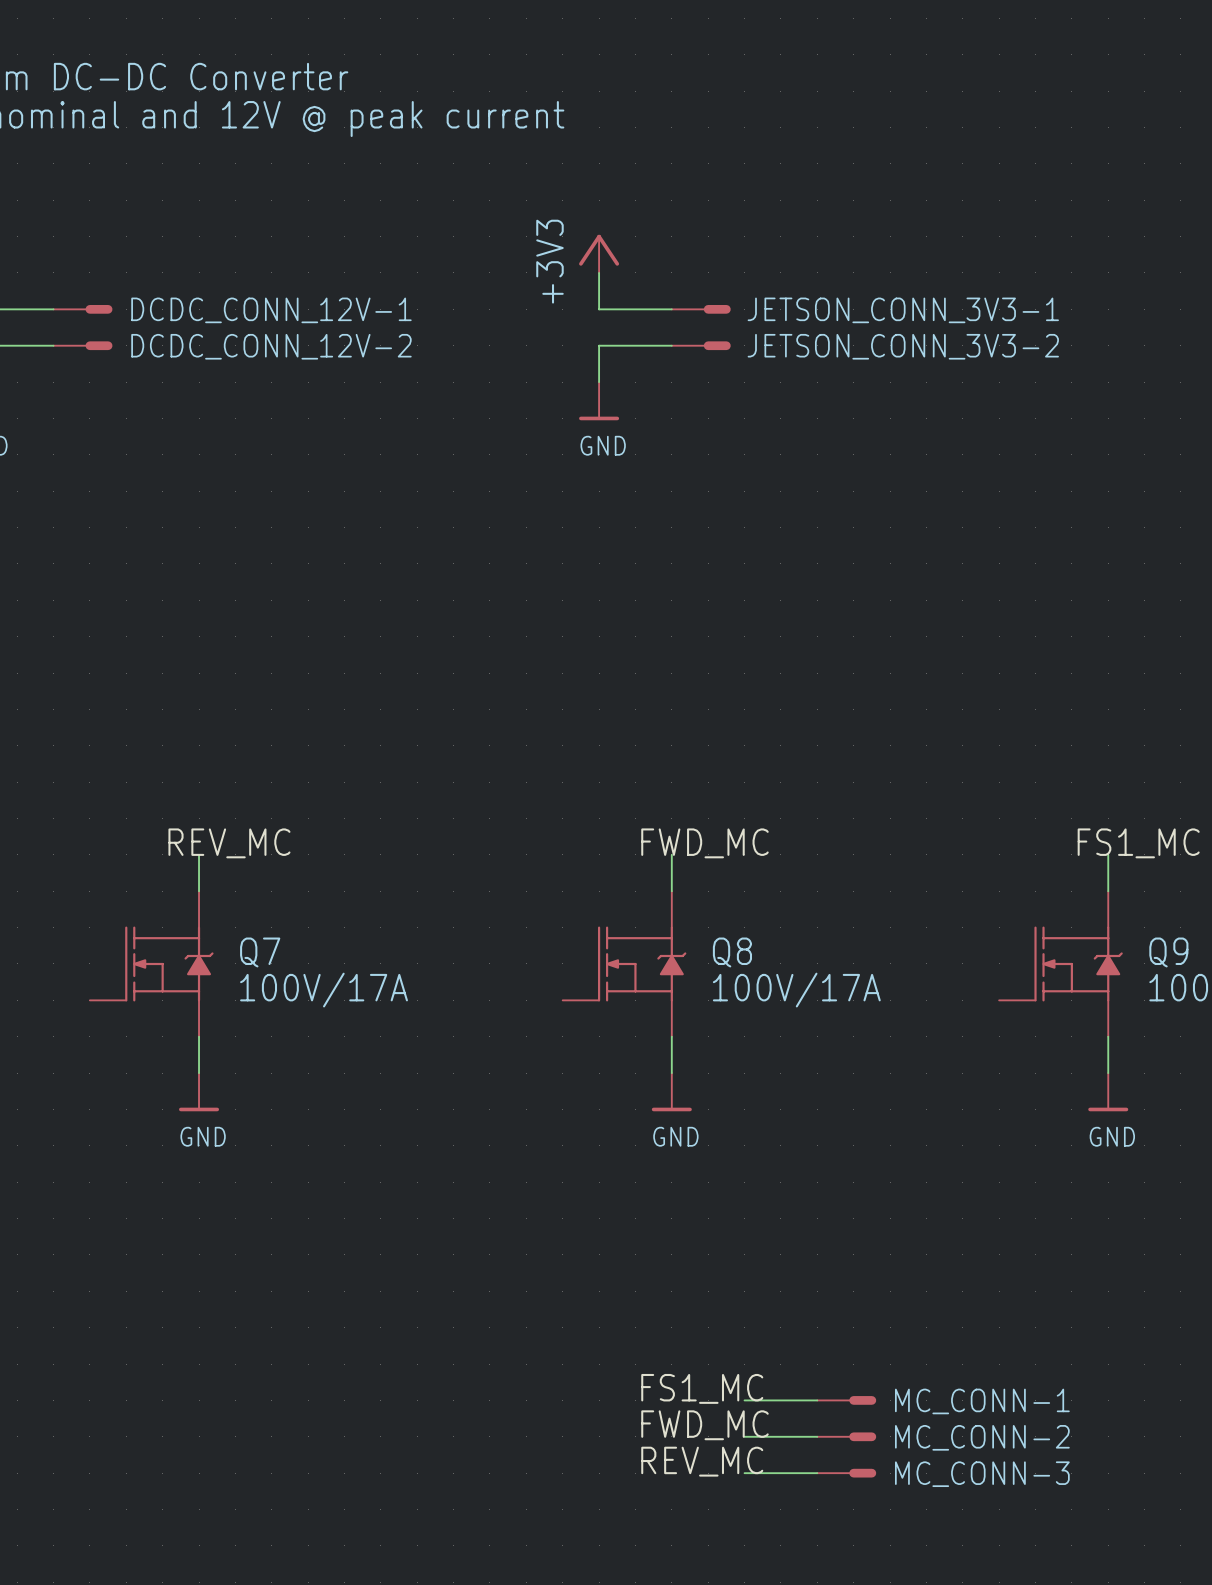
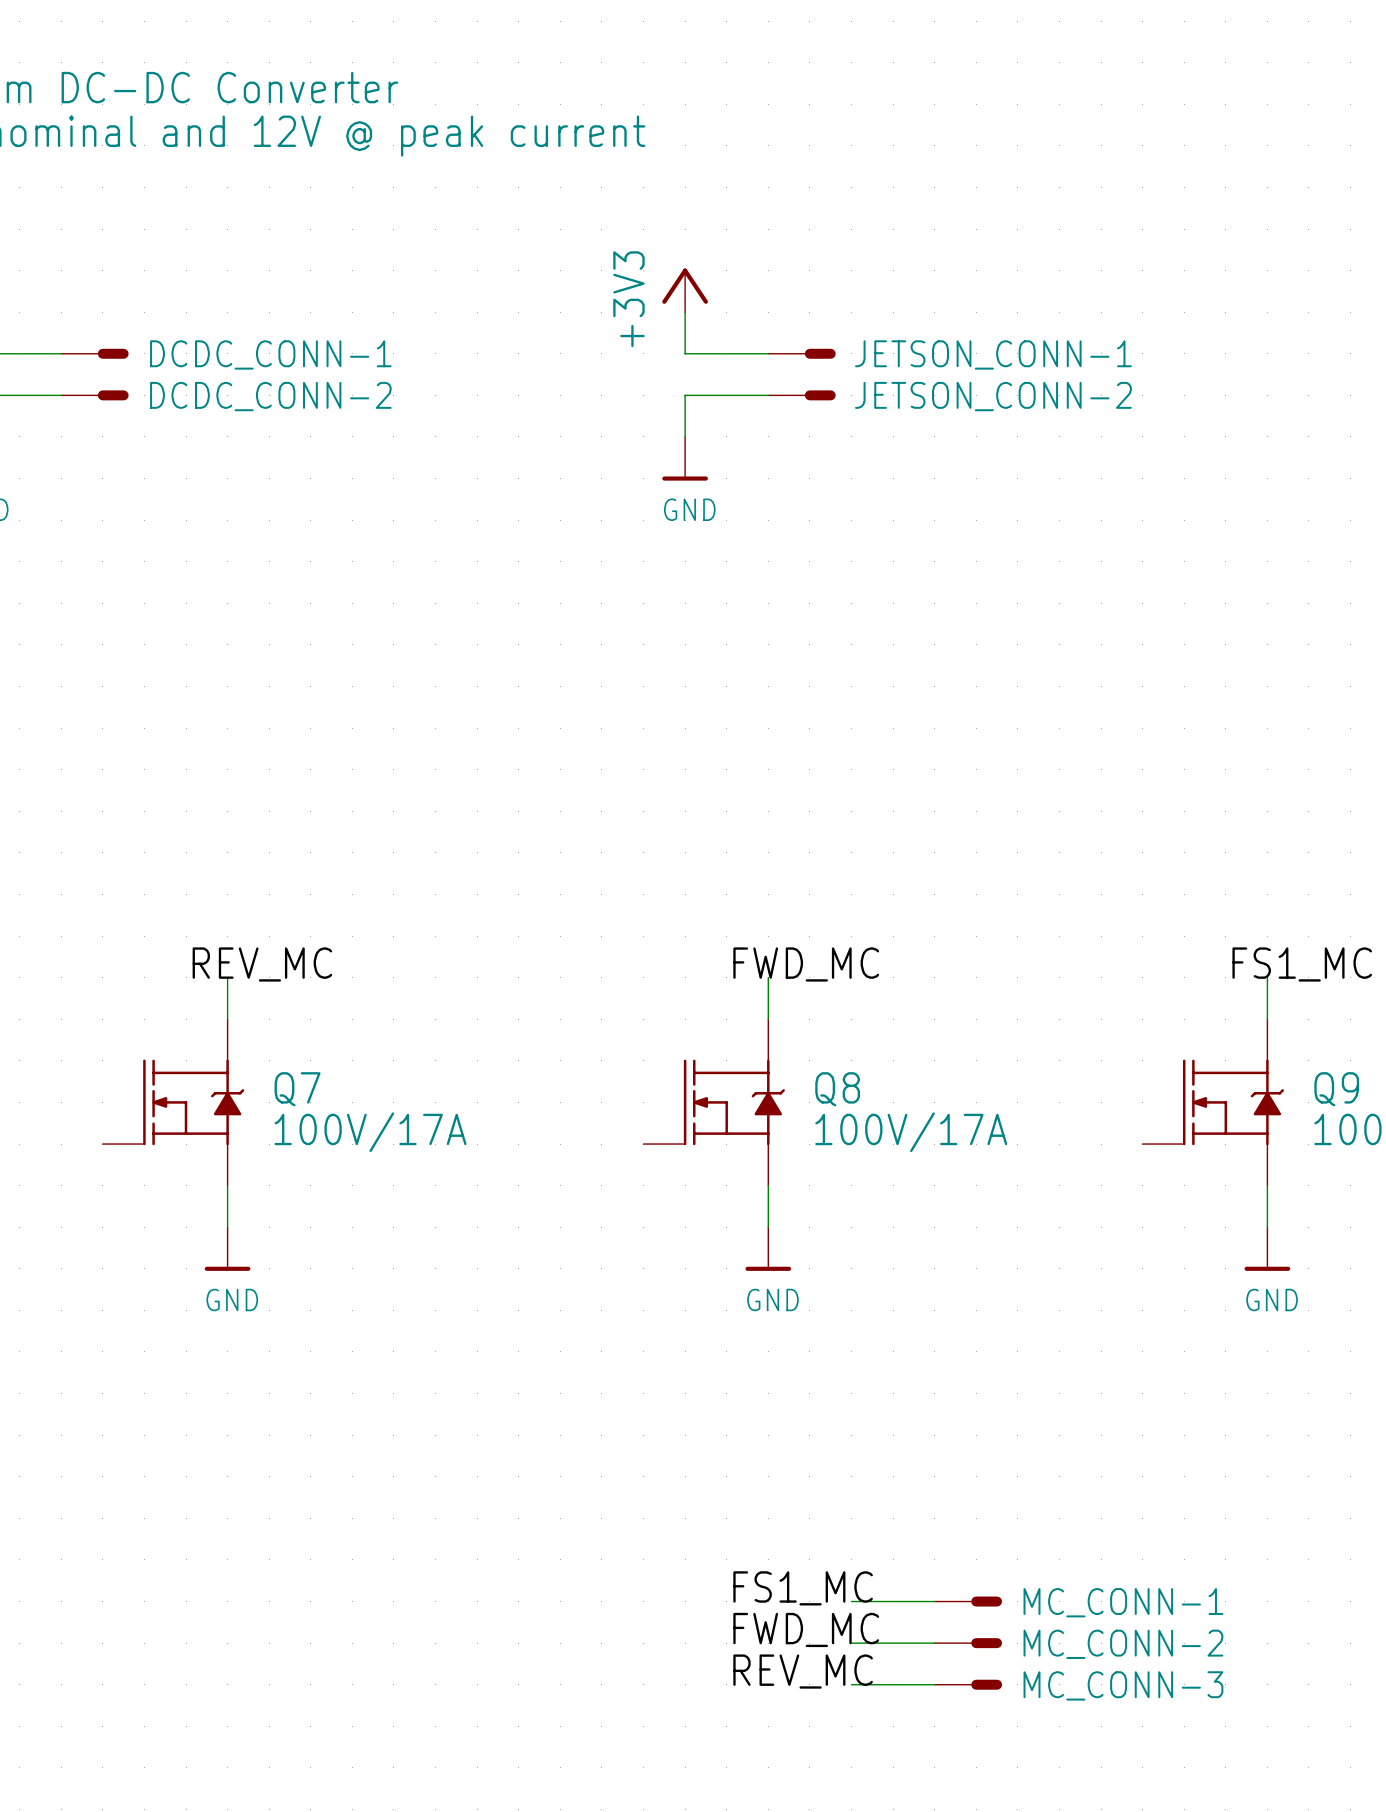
DCDC_CONN_12V-1 name: DCDC_CONN_12V-1 (271, 310) -> DCDC_CONN-1 (270, 354)
JETSON_CONN_3V3-1 name: JETSON_CONN_3V3-1 (903, 310) -> JETSON_CONN-1 (993, 354)
DCDC_CONN_12V-2 name: DCDC_CONN_12V-2 (271, 346) -> DCDC_CONN-2 (270, 396)
JETSON_CONN_3V3-2 name: JETSON_CONN_3V3-2 (903, 346) -> JETSON_CONN-2 (993, 396)

